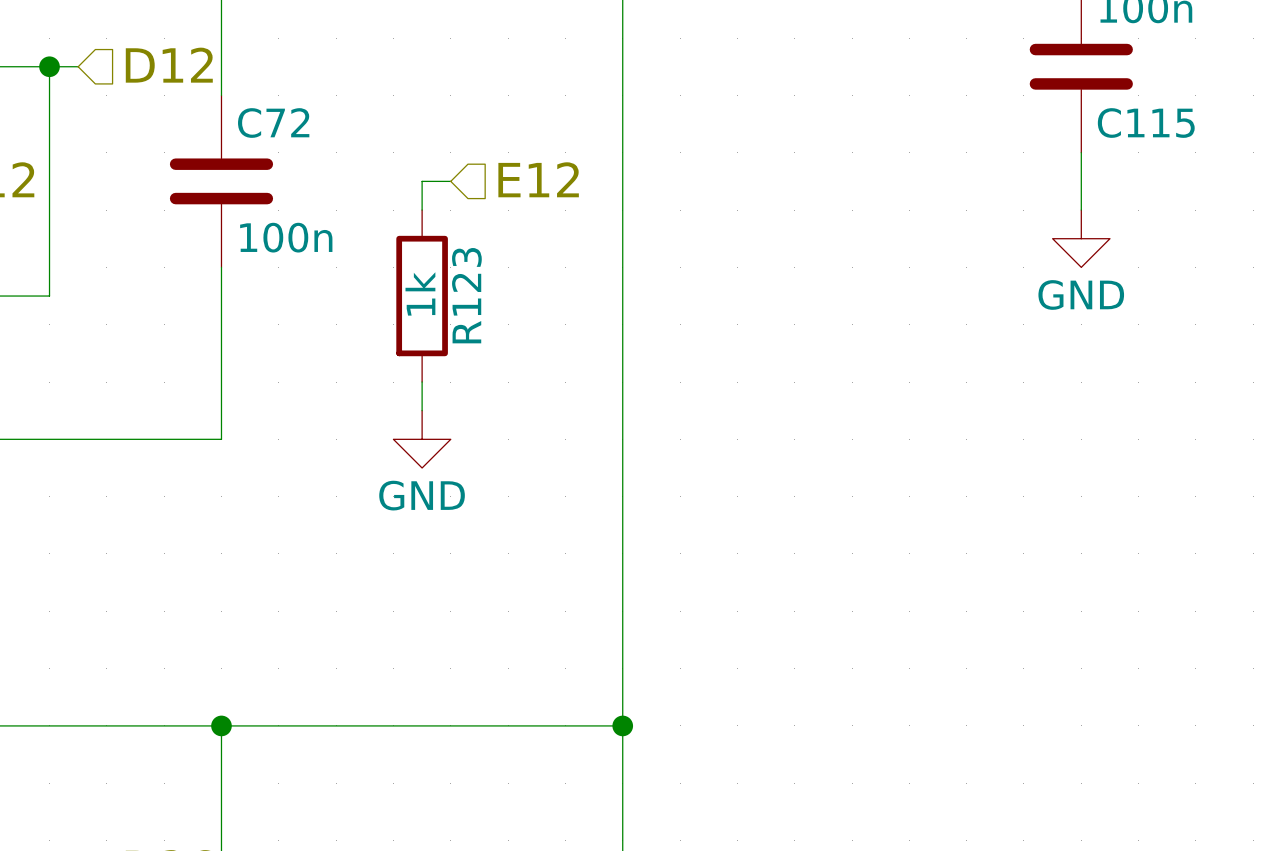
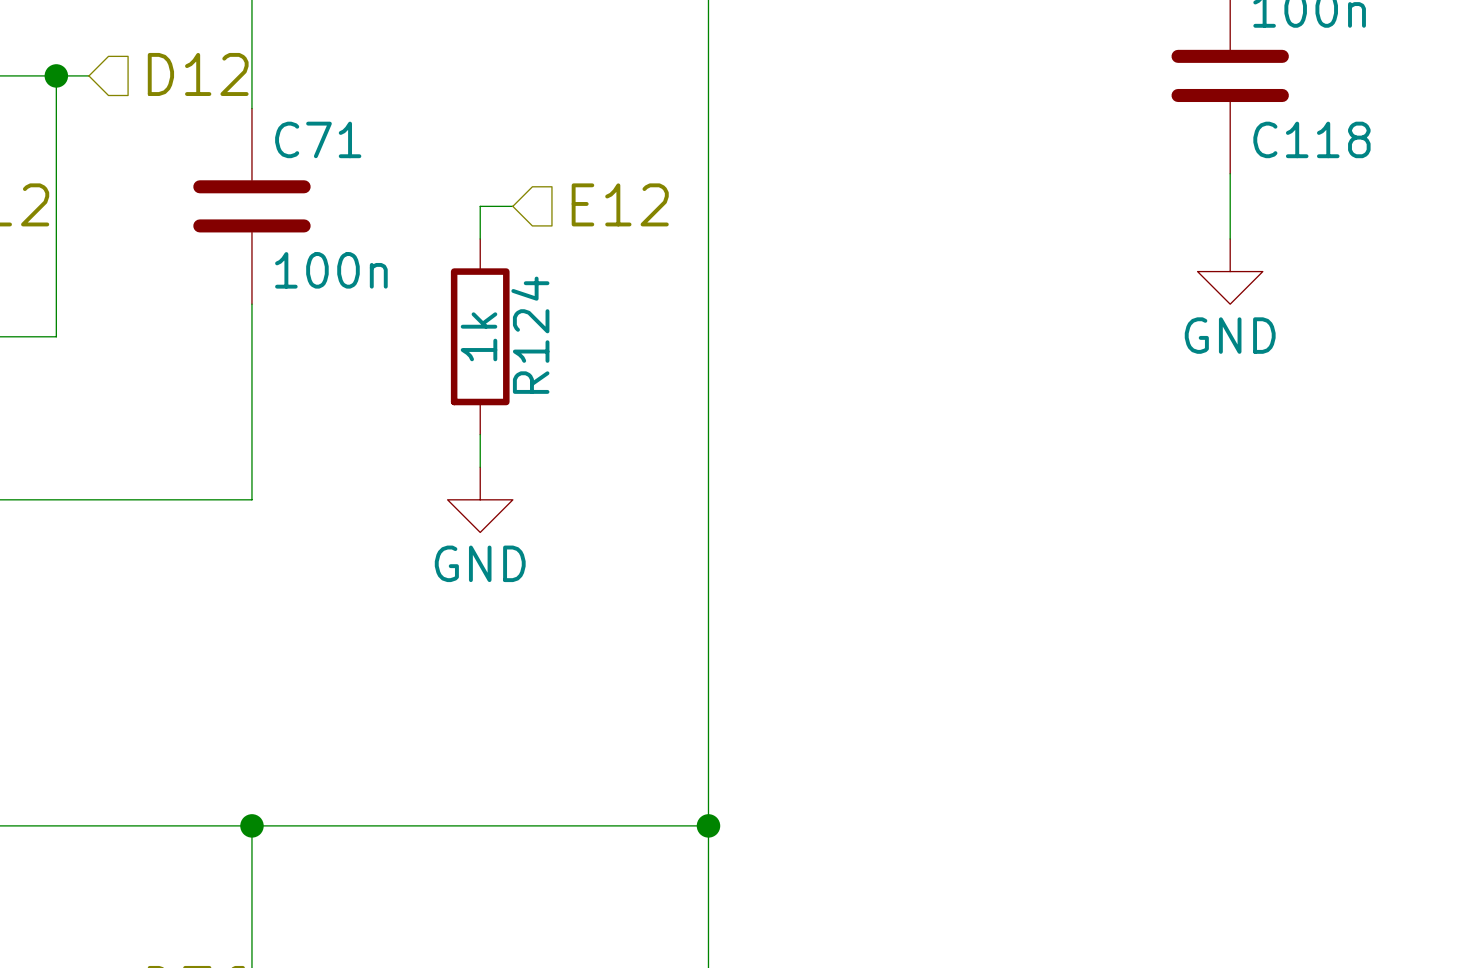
C72 name: C72 (273, 123) -> C71 (318, 139)
C115 name: C115 (1146, 123) -> C118 (1311, 139)
R123 name: R123 (466, 295) -> R124 (530, 335)

